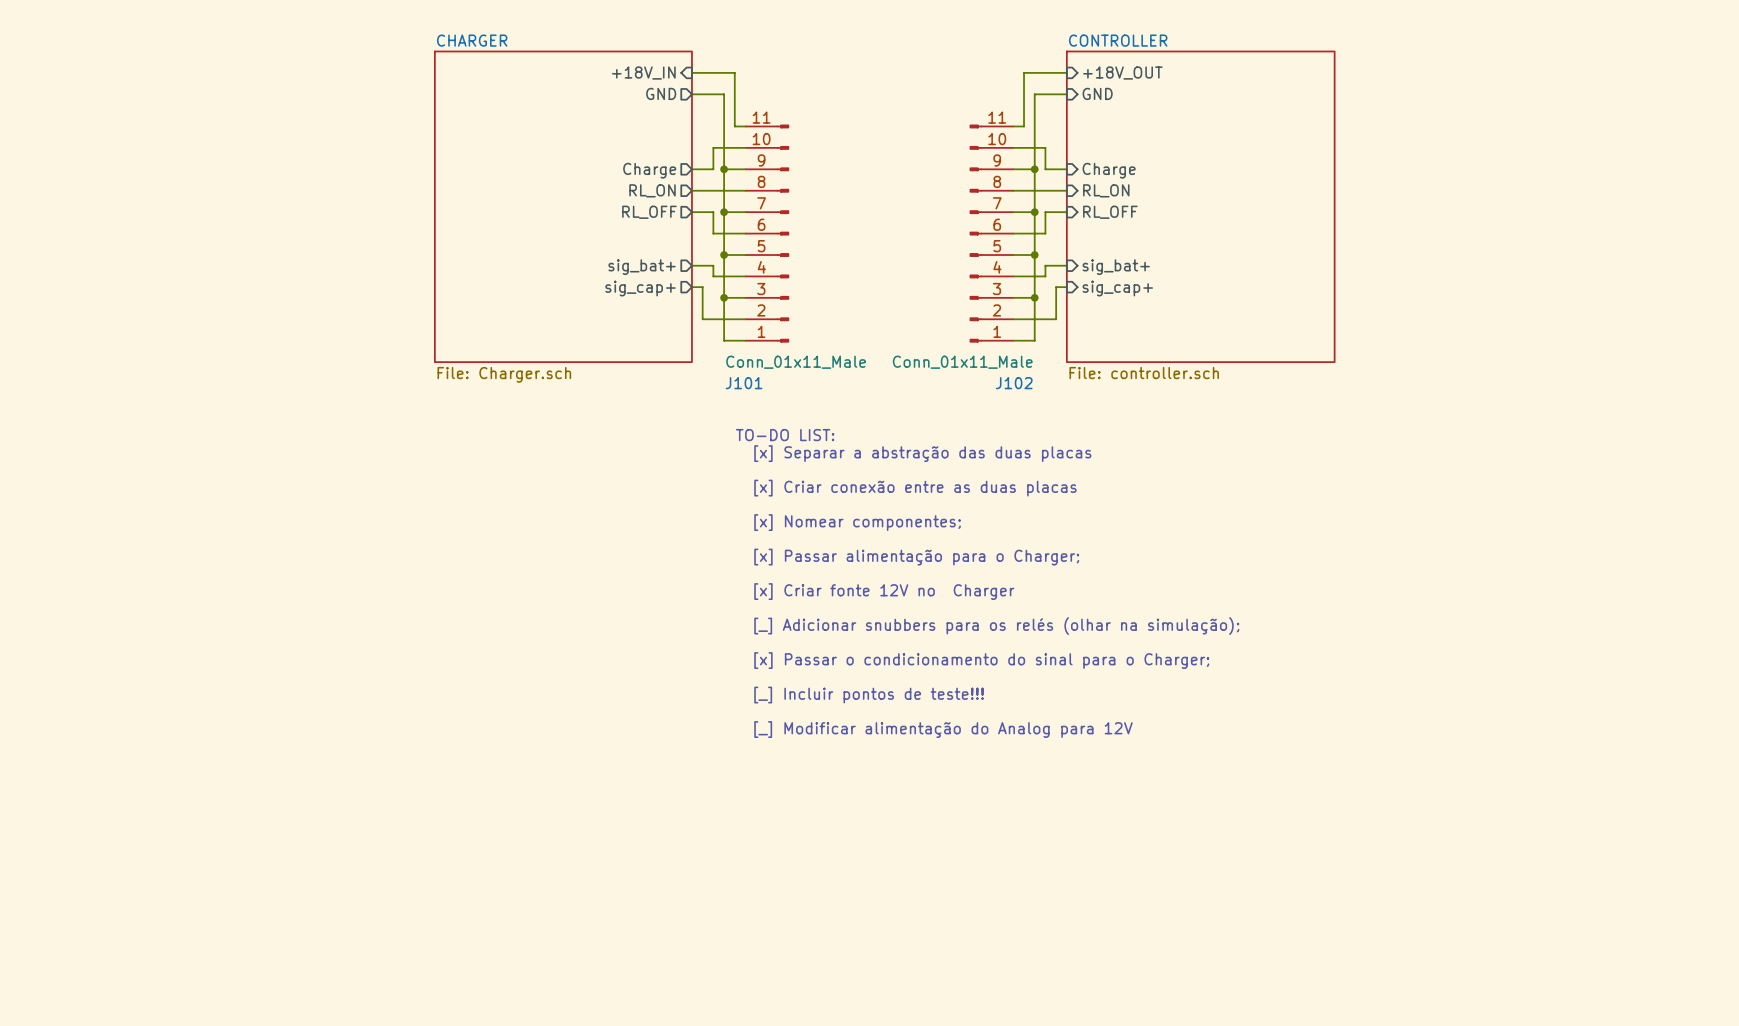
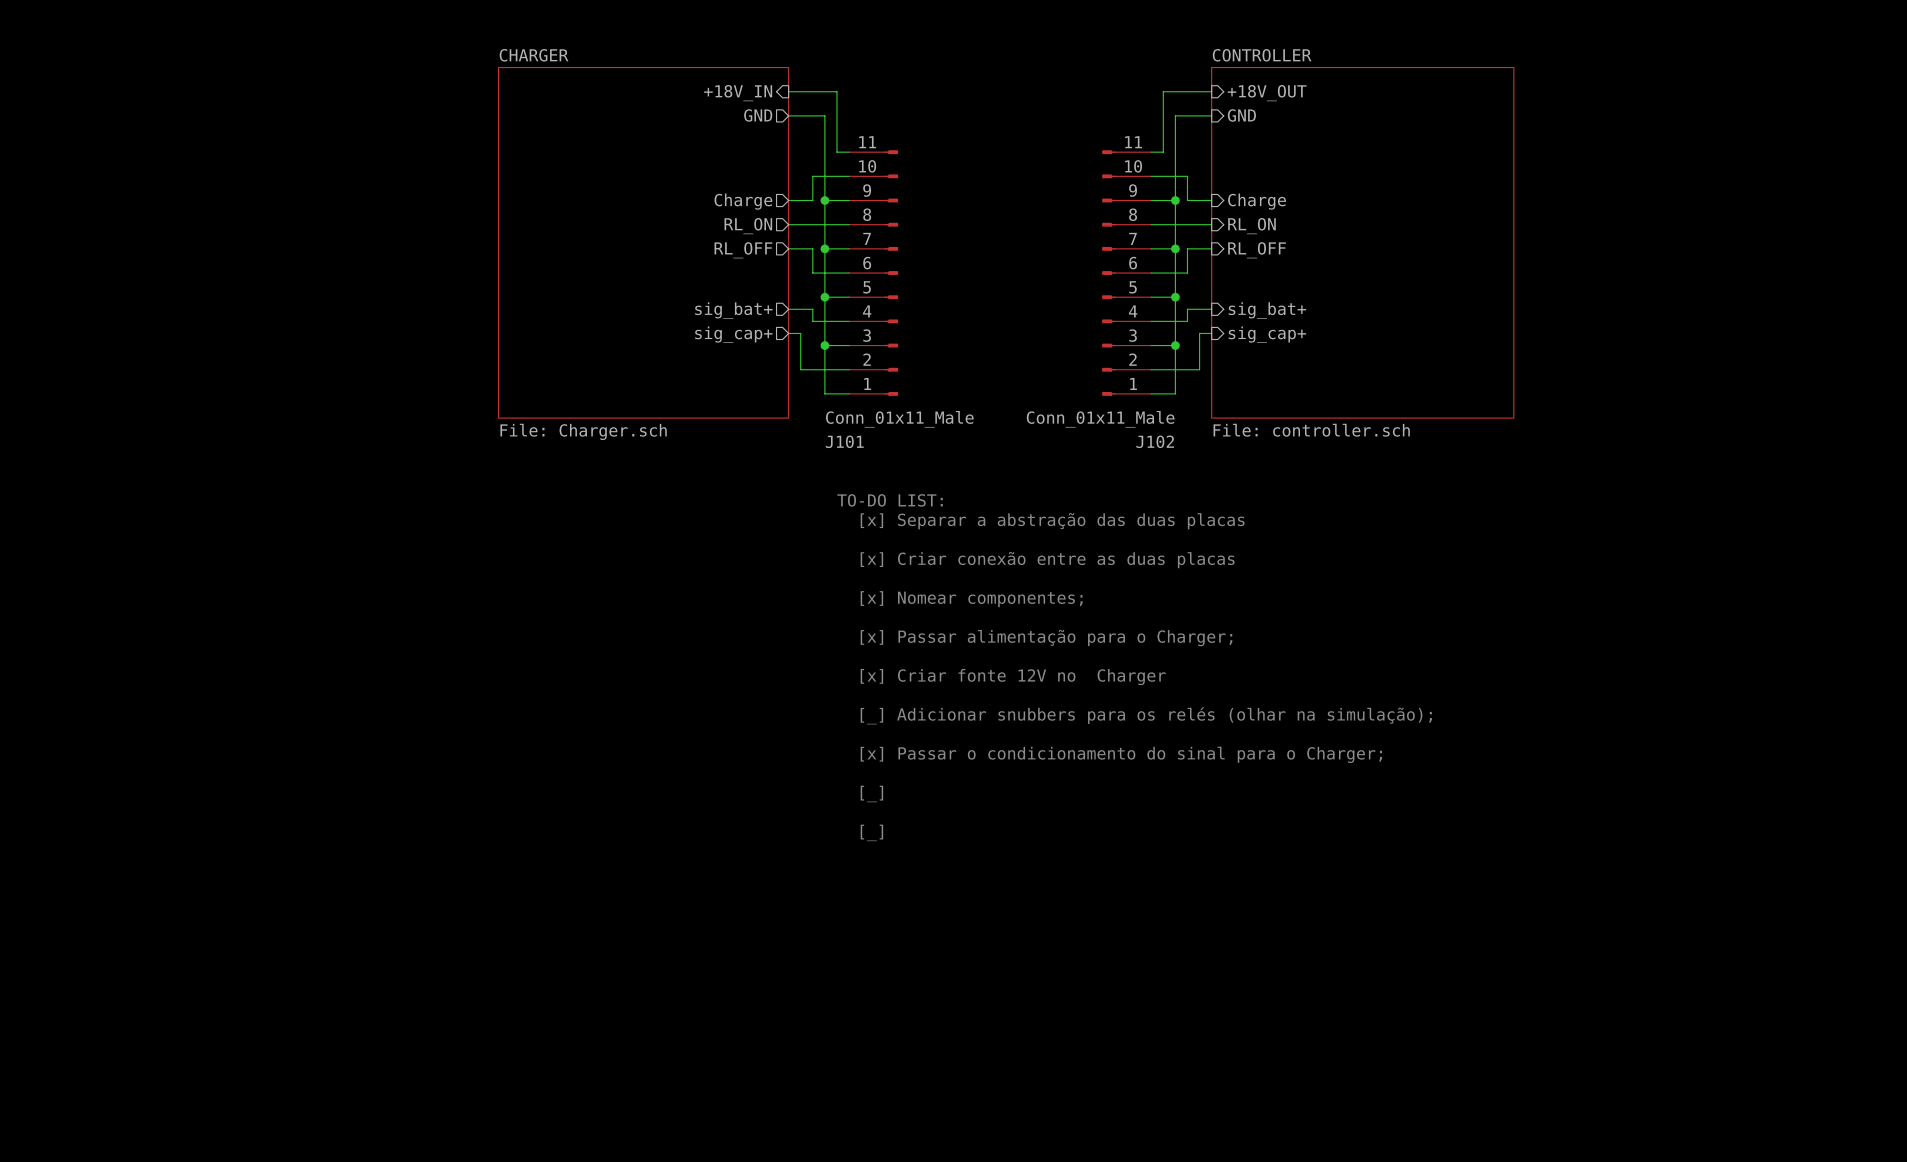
text: [_] Incluir pontos de teste!!! (869, 695) -> [_] (871, 793)
text: [_] Modificar alimentação do Analog para 12V (943, 729) -> [_] (871, 832)

